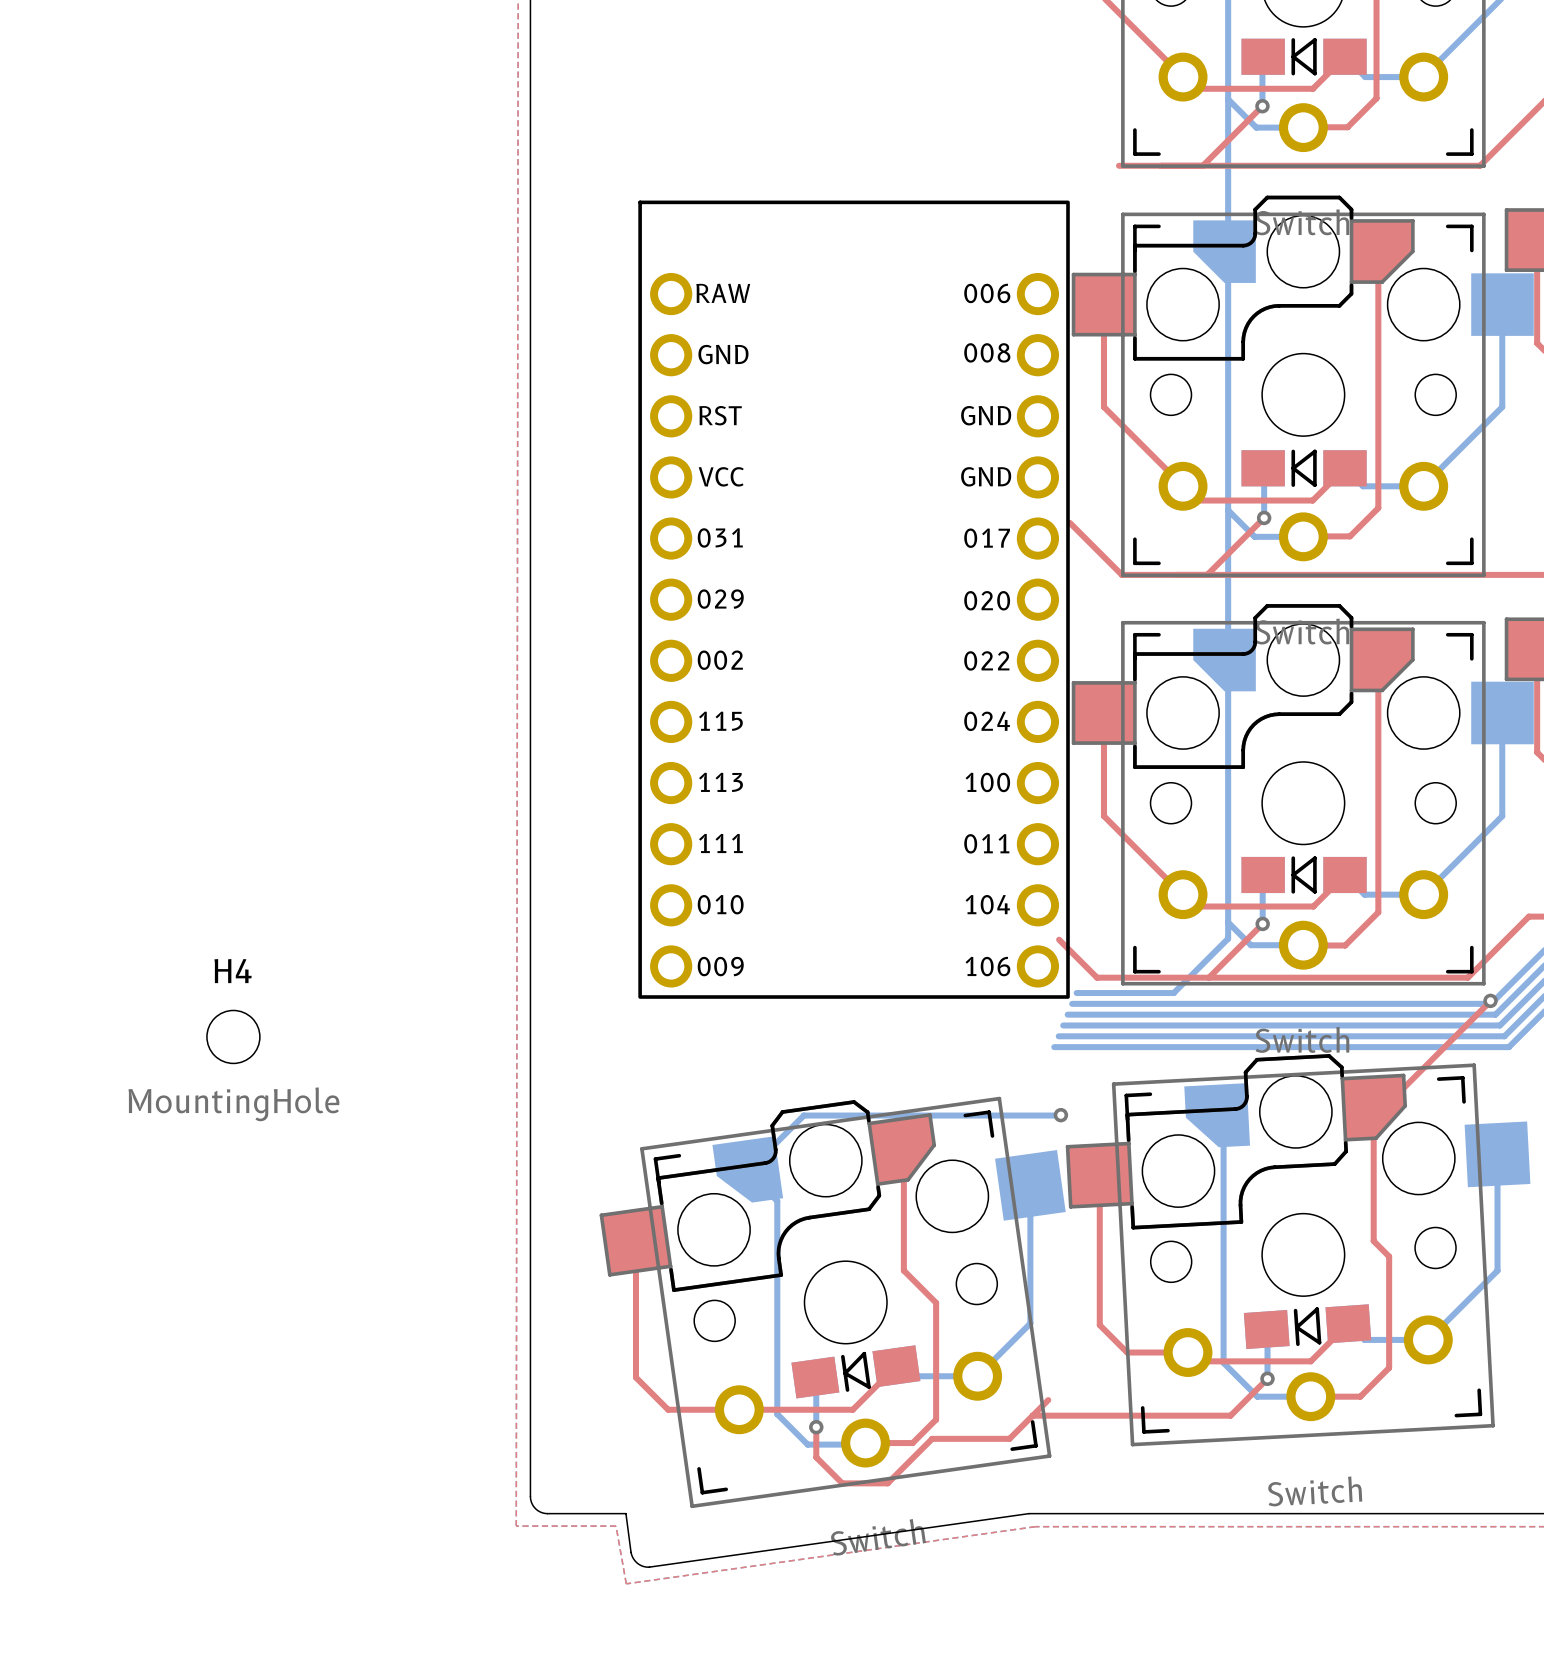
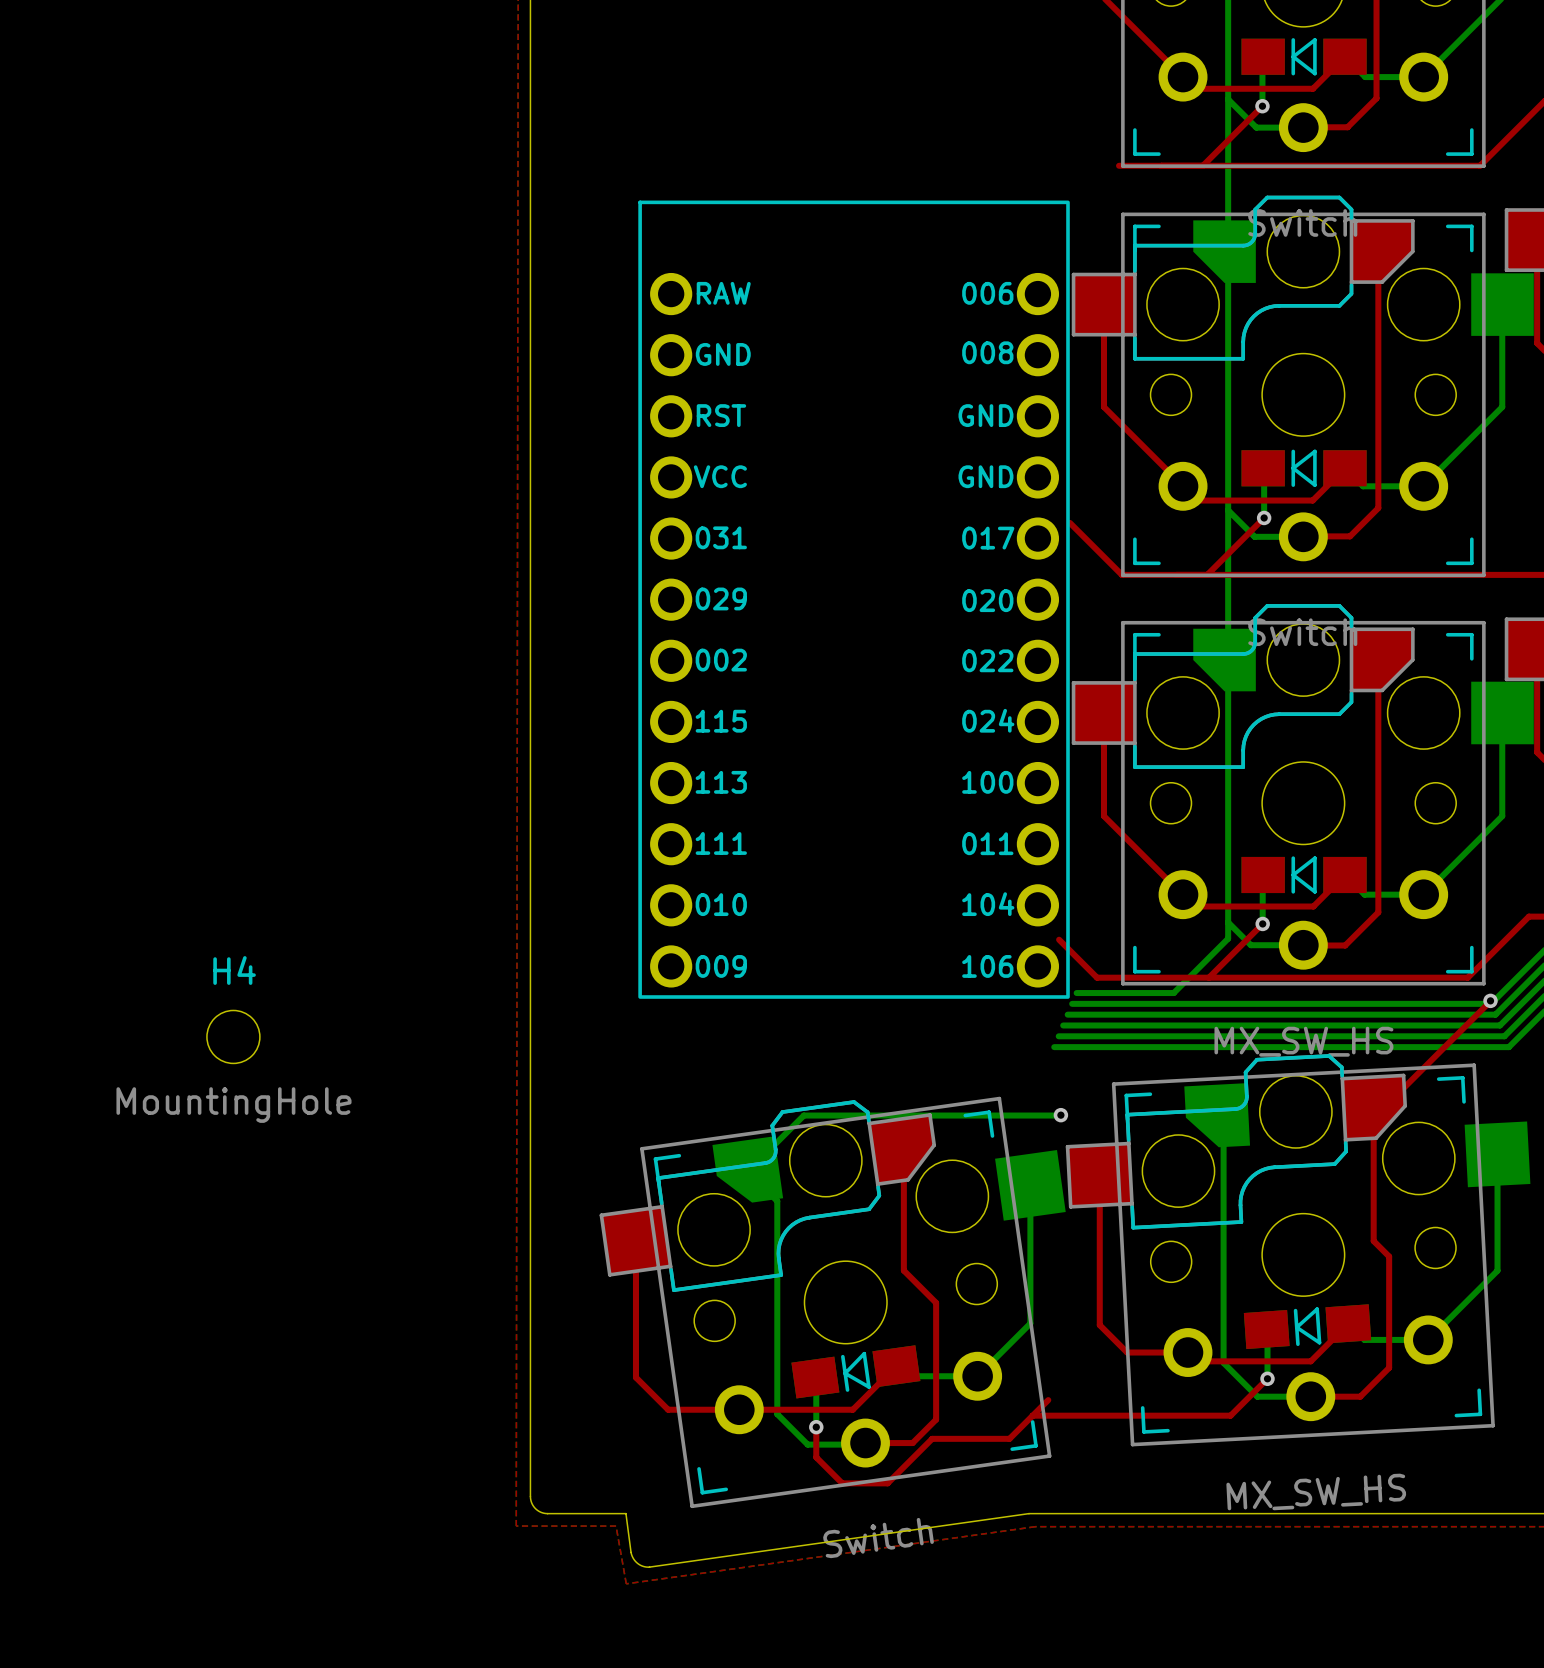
part value: Switch (1302, 1039) -> MX_SW_HS (1303, 1041)
part value: Switch (1315, 1491) -> MX_SW_HS (1316, 1491)

